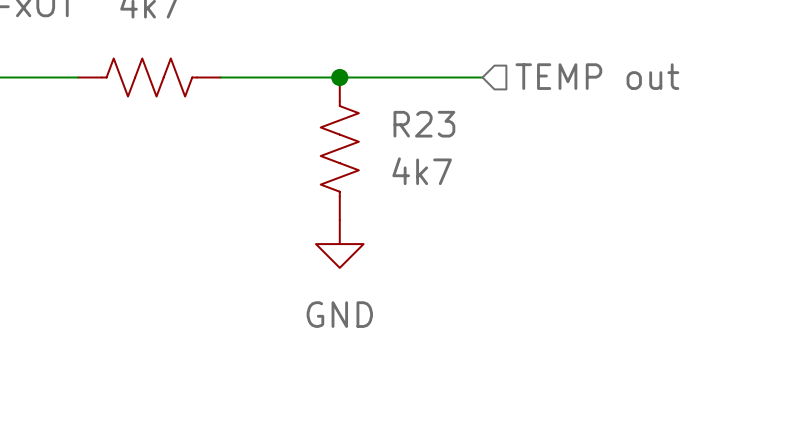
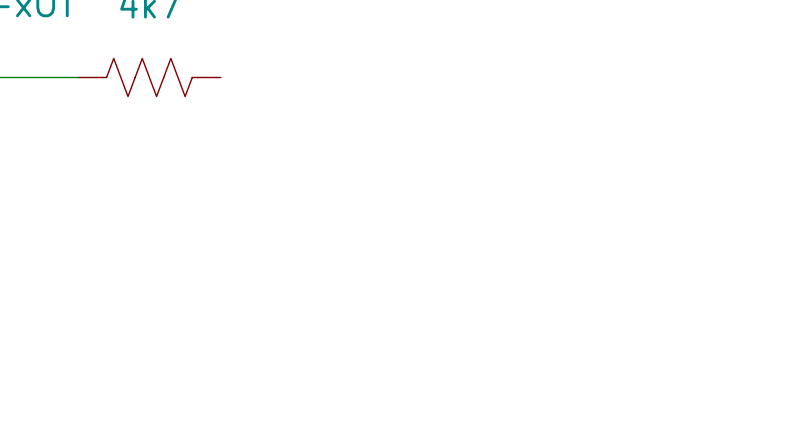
hierarchical label: TEMP out (597, 76) -> none
wire: (220, 77) (482, 77) -> none
junction: (339, 77) -> none
R23: 4k7 (339, 148) -> none
power symbol: GND (339, 244) -> none

